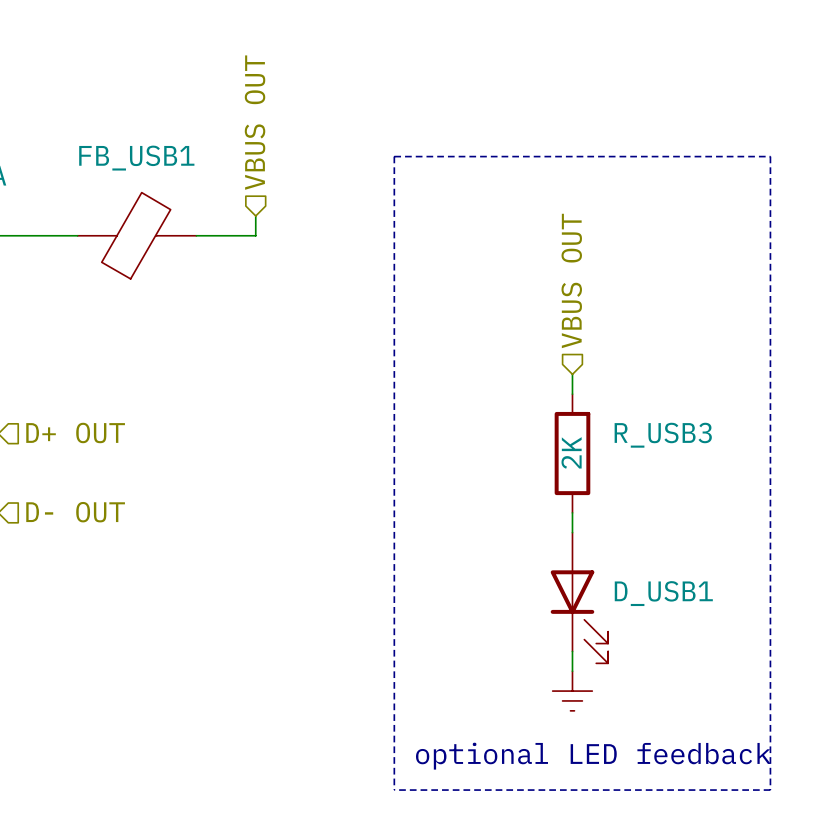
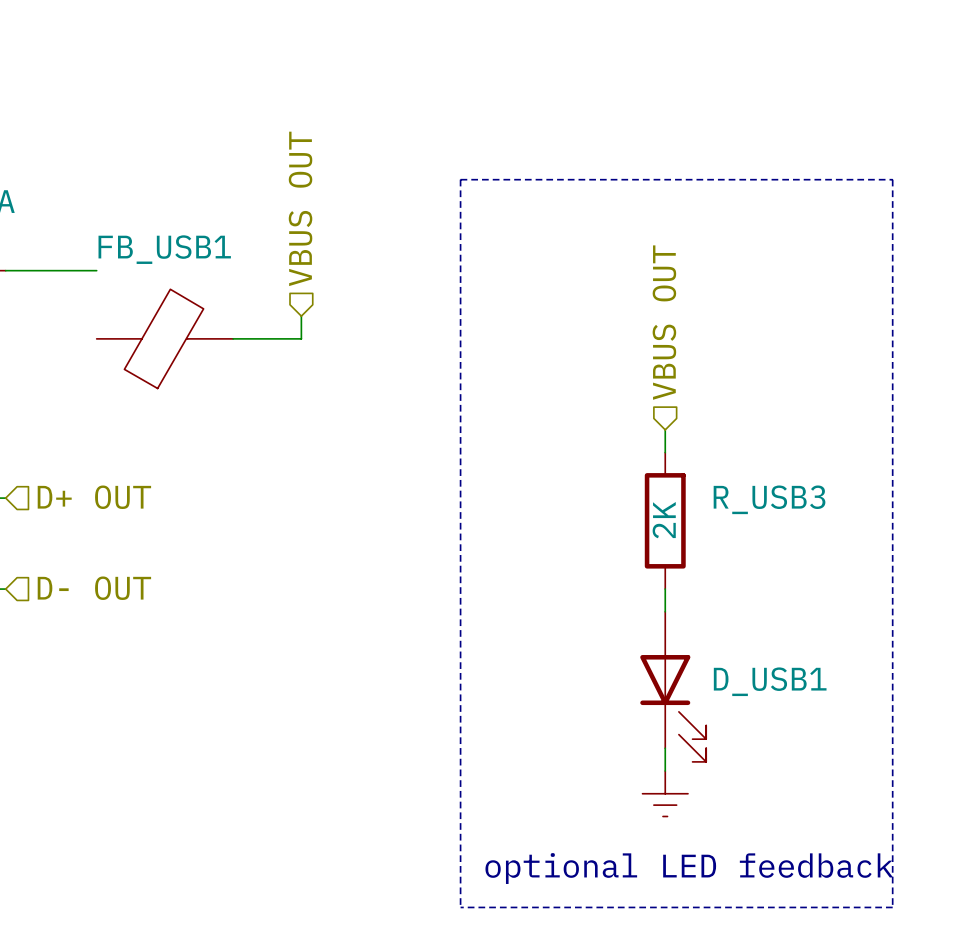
hierarchical label position: VBUS OUT (255, 122) -> VBUS OUT (300, 208)
wire: (255, 215) (255, 235) (196, 235) -> (301, 316) (301, 338) (233, 338)
FB_USB1 position: (136, 235) -> (164, 338)

